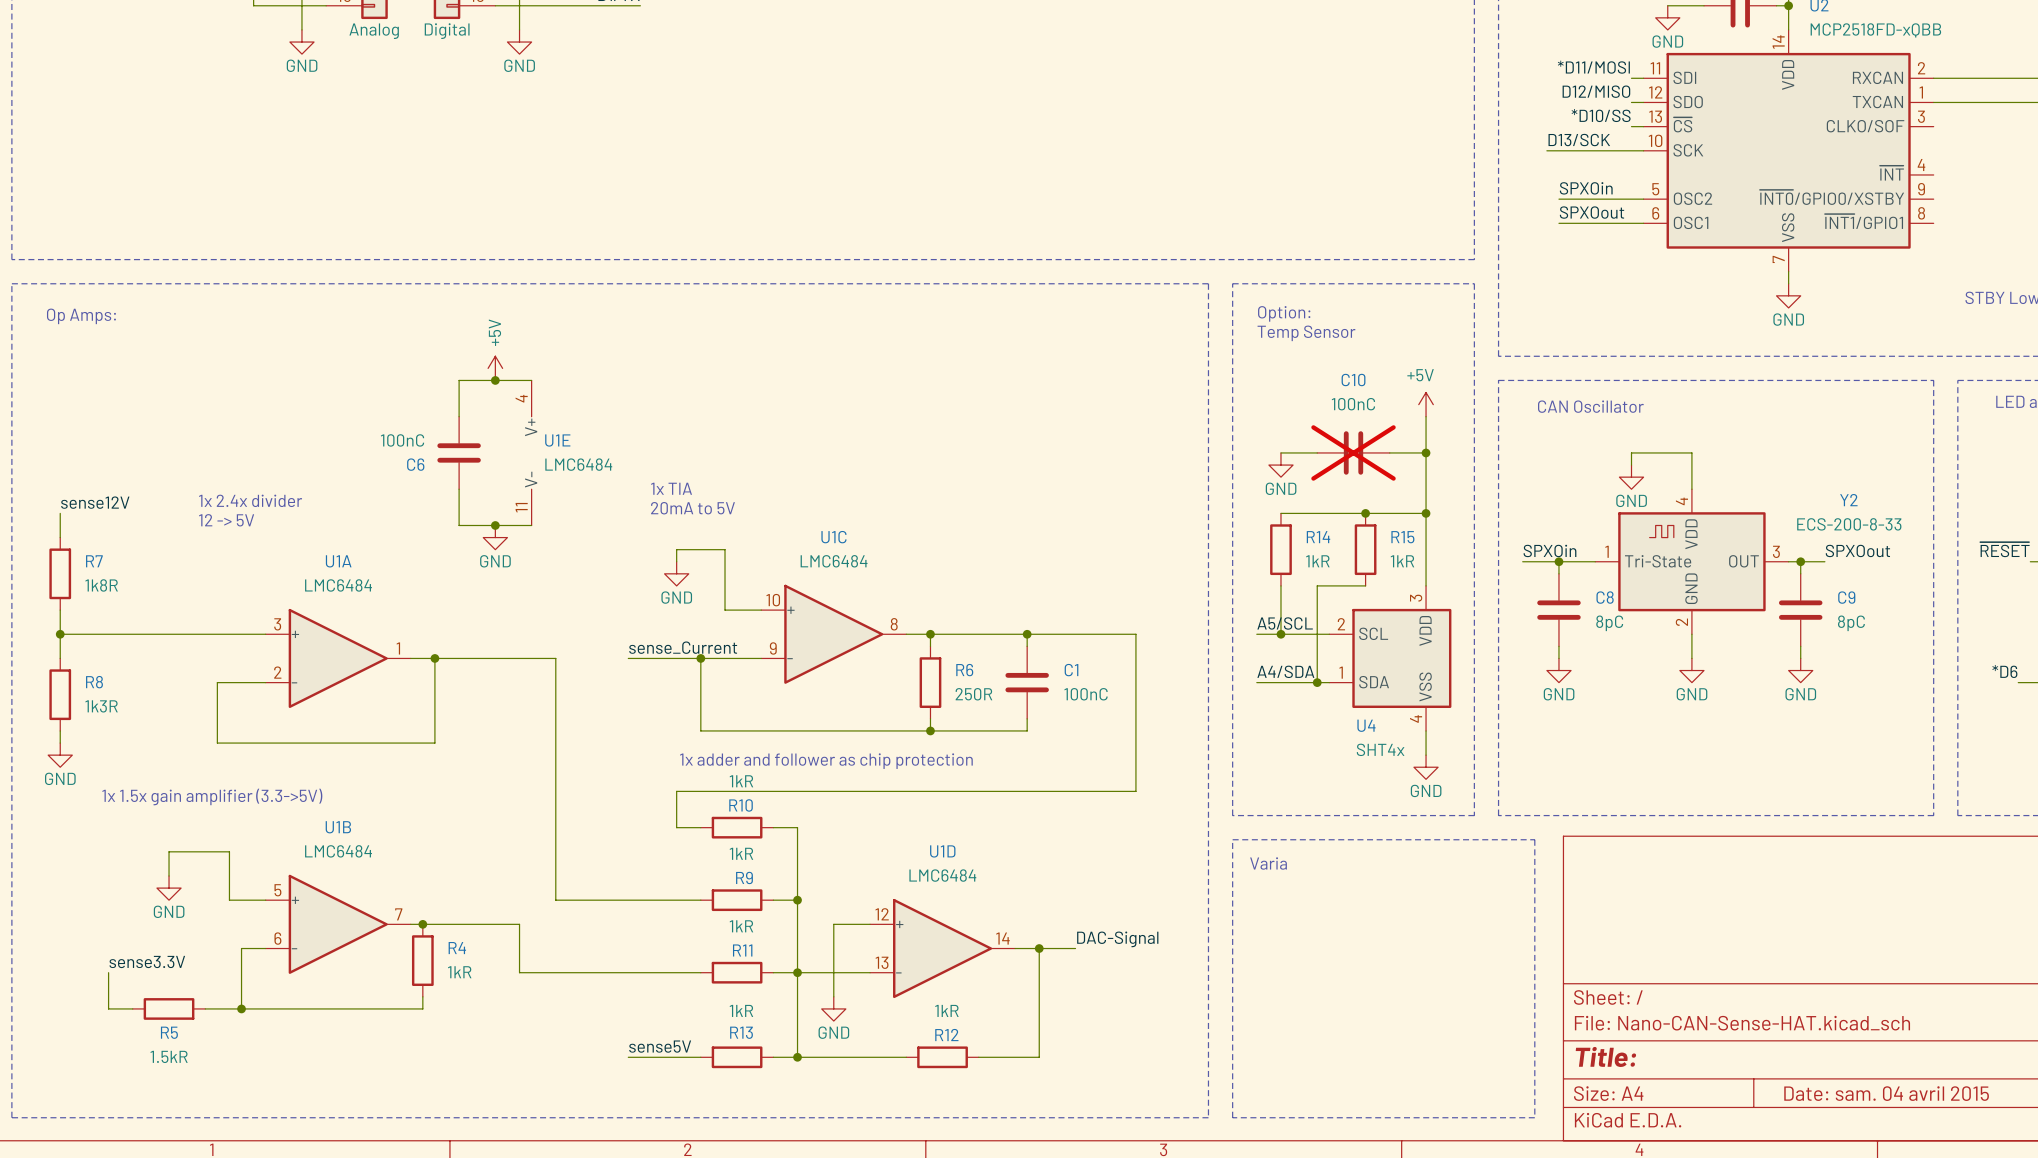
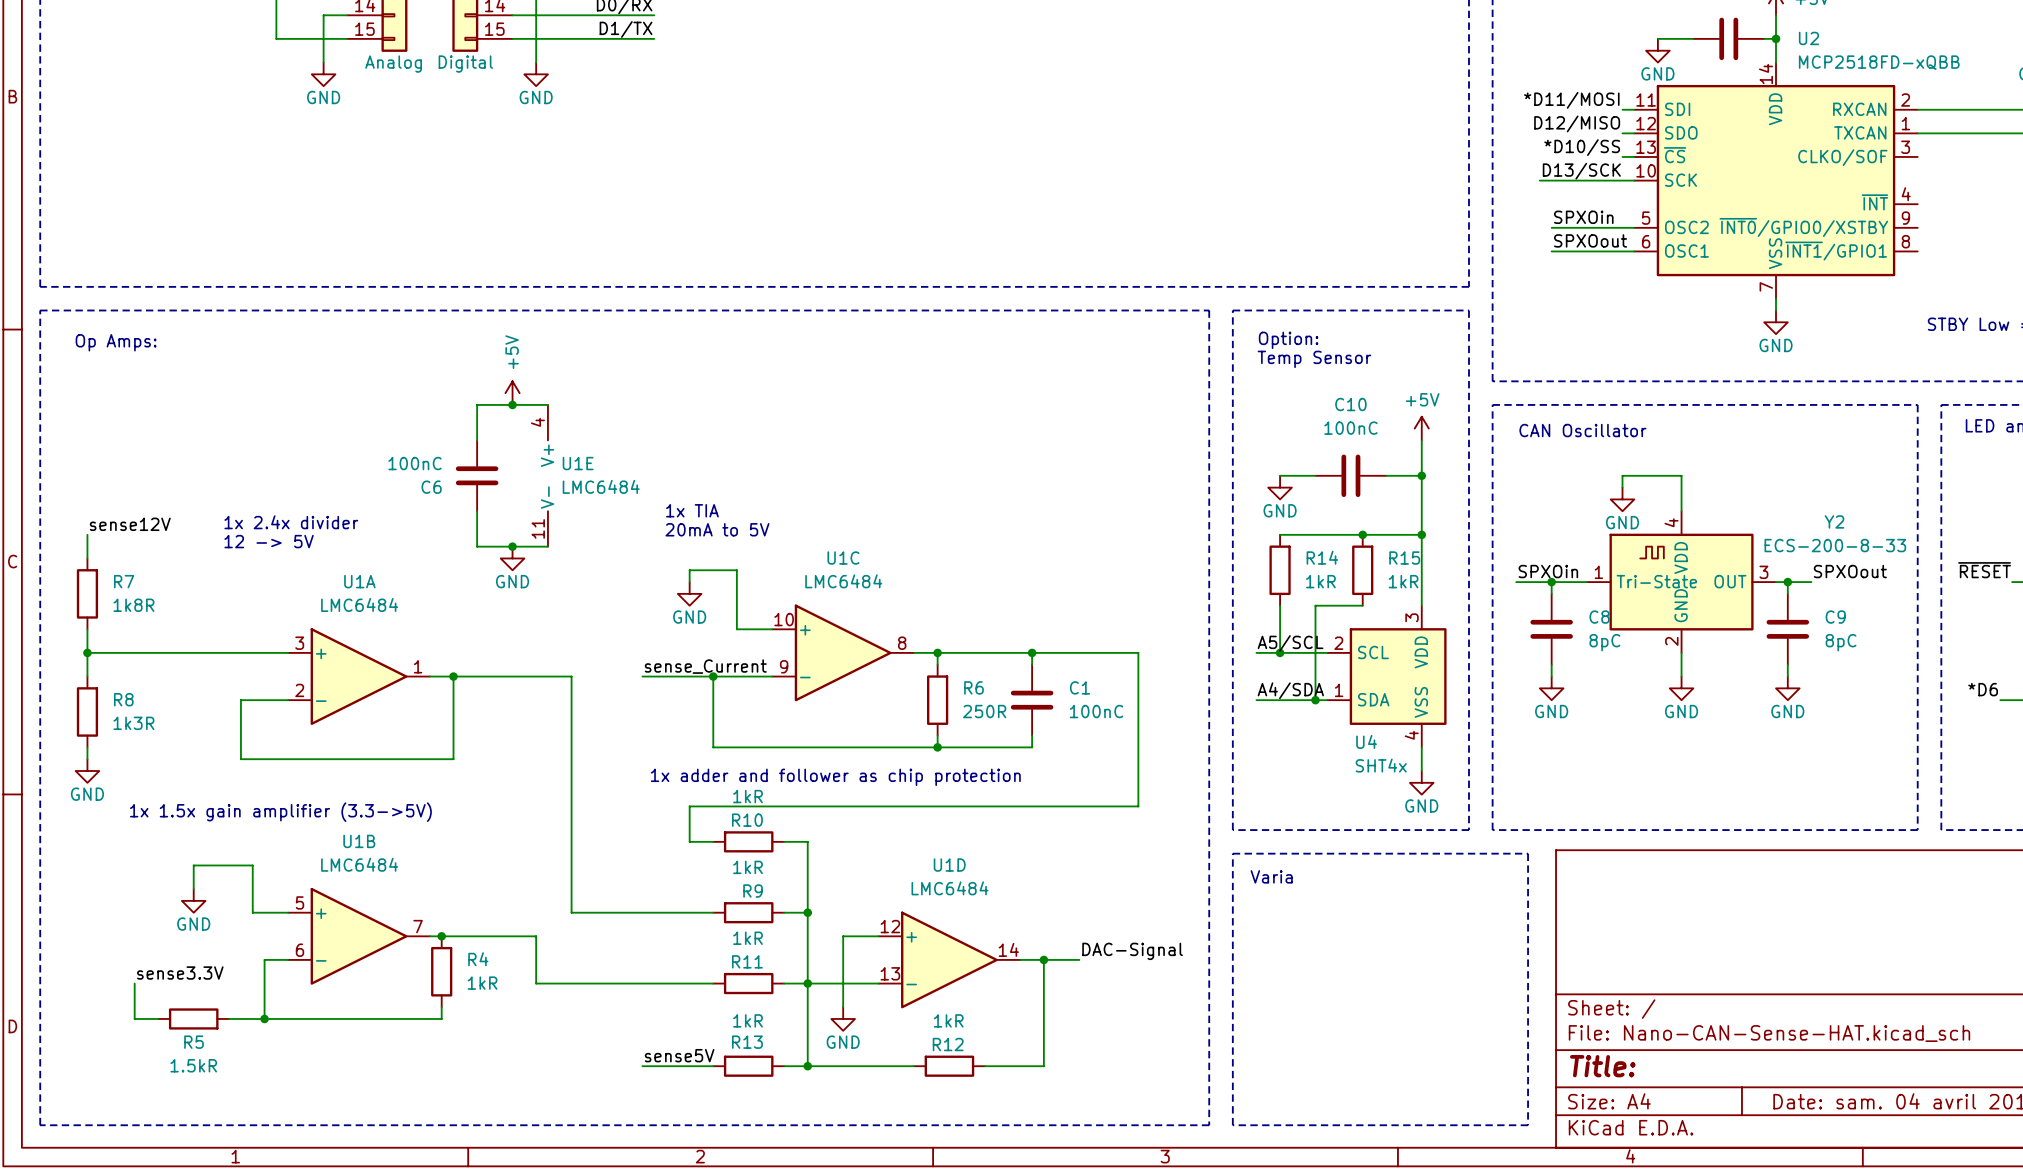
C10 do-not-place cross: (1353, 452) -> none

